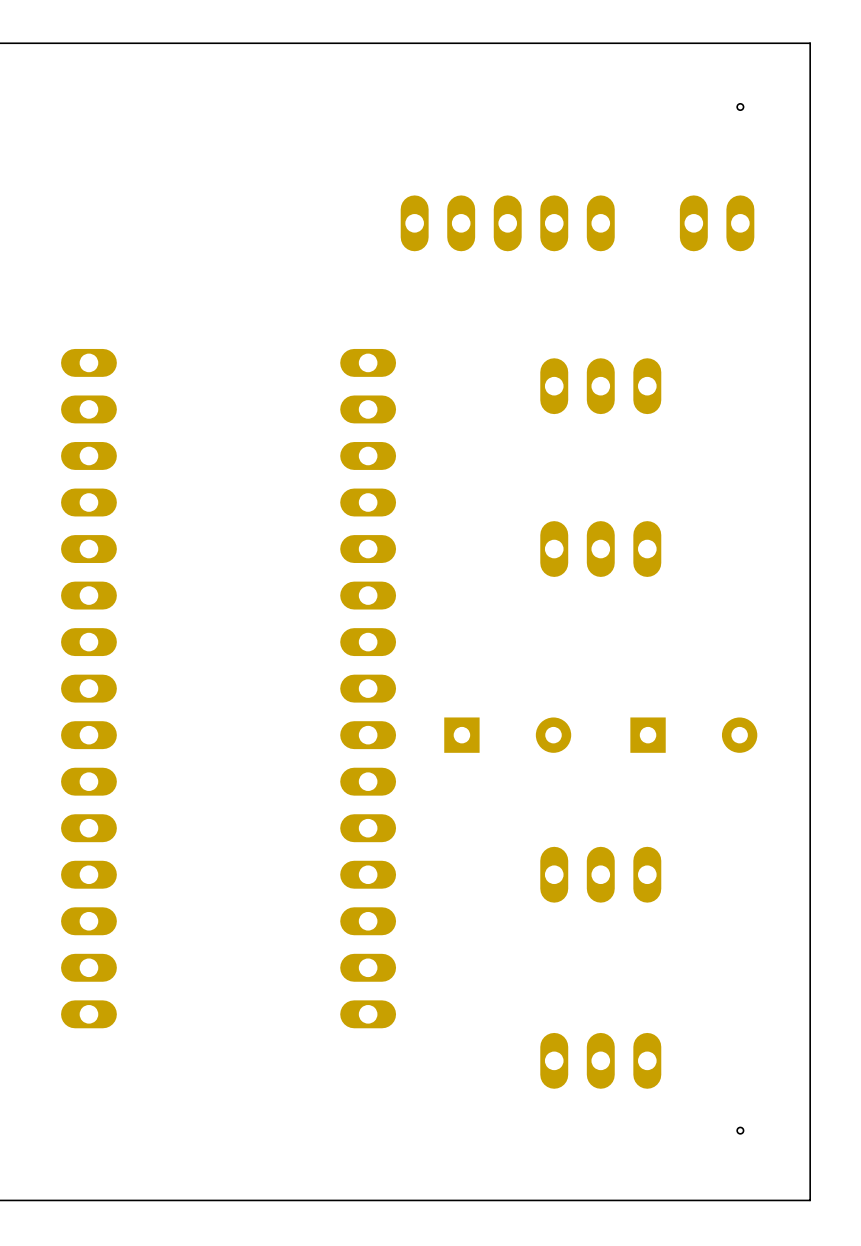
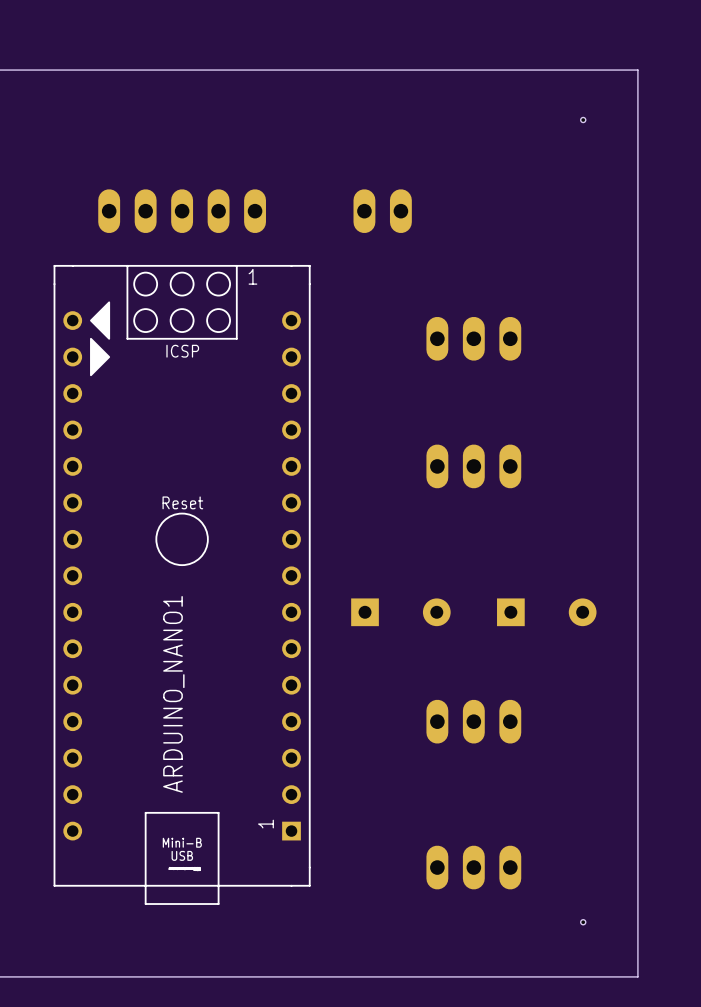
part position: (507, 223) -> (182, 211)
part position: (717, 223) -> (382, 211)
part: (88, 688) -> none
part: (368, 688) -> none
ARDUINO_NANO1: none -> (182, 584)

